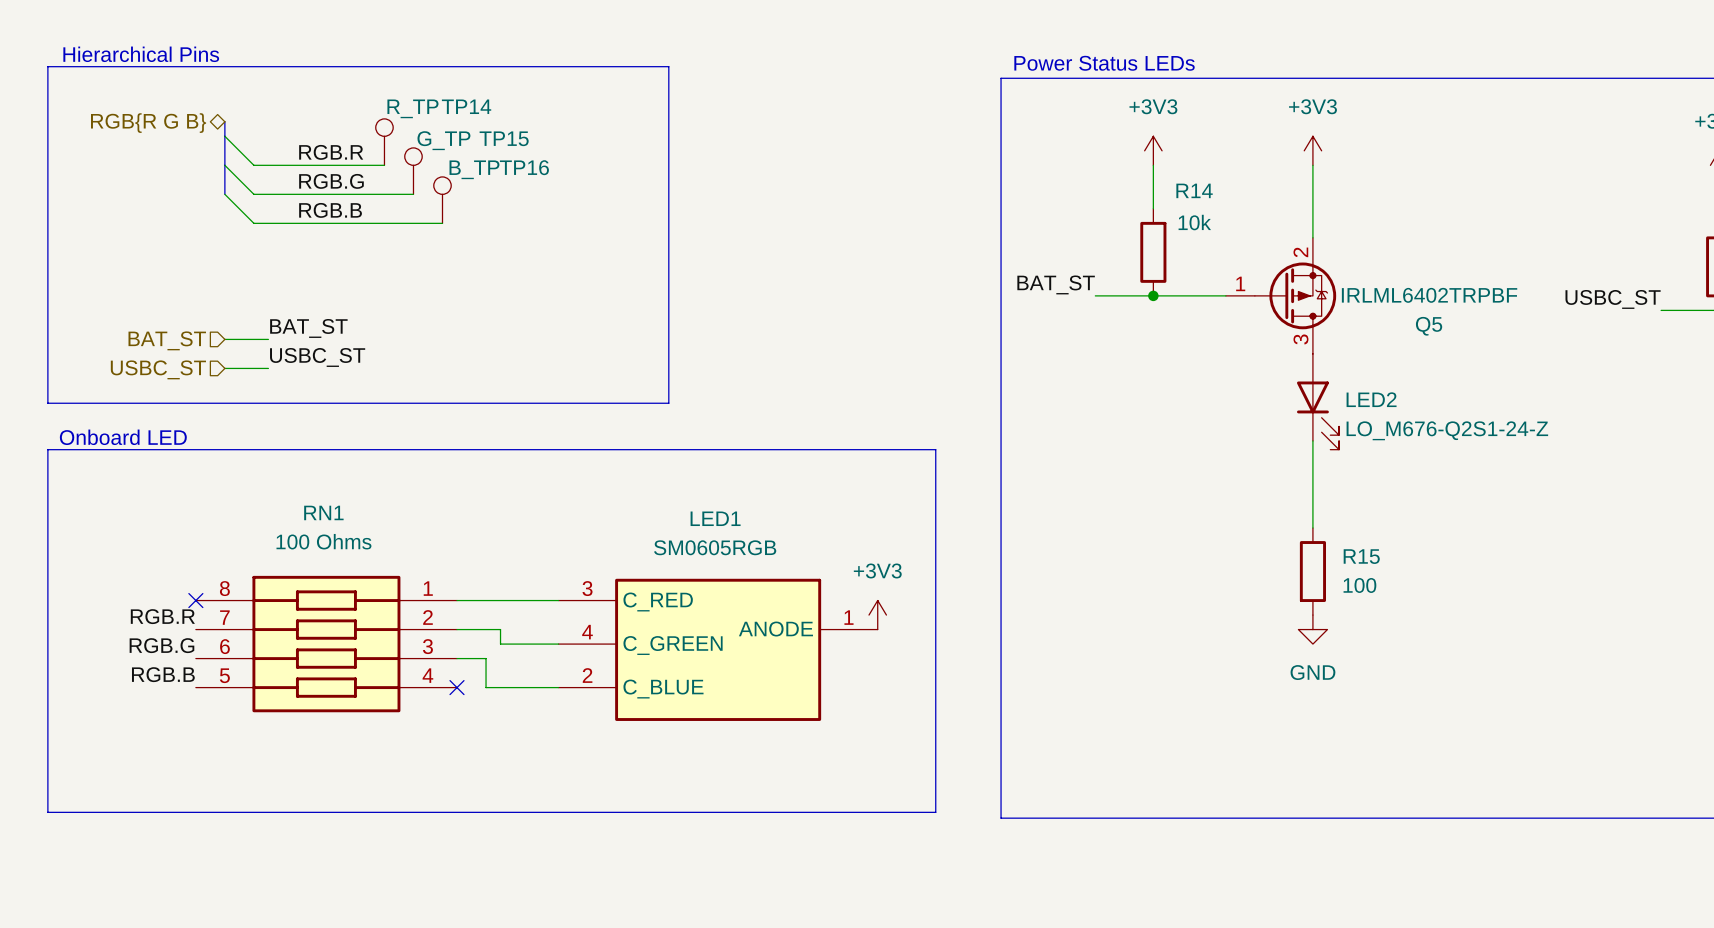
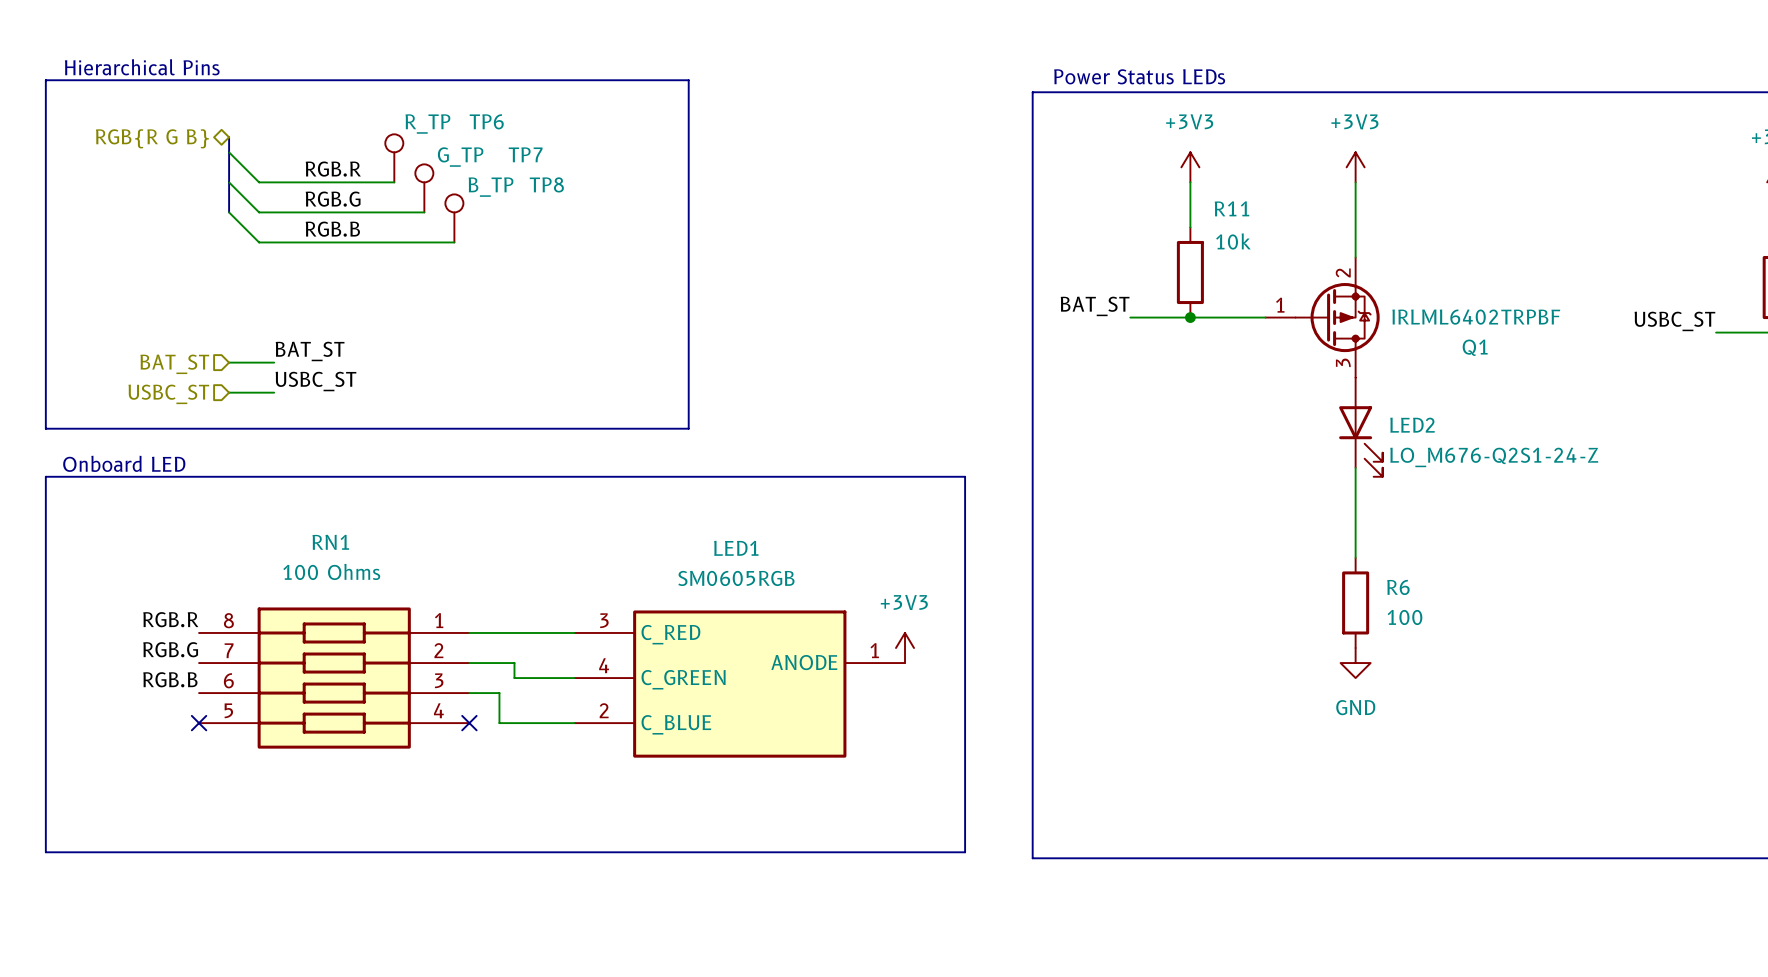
TP14 name: TP14 (466, 106) -> TP6 (486, 121)
TP15 name: TP15 (504, 138) -> TP7 (525, 154)
TP16 name: TP16 (524, 167) -> TP8 (546, 184)
R14 name: R14 (1194, 190) -> R11 (1231, 208)
Q5 name: Q5 (1429, 326) -> Q1 (1475, 347)
R15 name: R15 (1361, 556) -> R6 (1398, 587)
label: none -> RGB.R (170, 619)
no-connect mark: (195, 600) -> none
label: RGB.R (162, 616) -> RGB.G (170, 649)
label: RGB.G (161, 645) -> RGB.B (170, 679)
label: RGB.B (163, 674) -> none
no-connect mark: none -> (199, 723)

